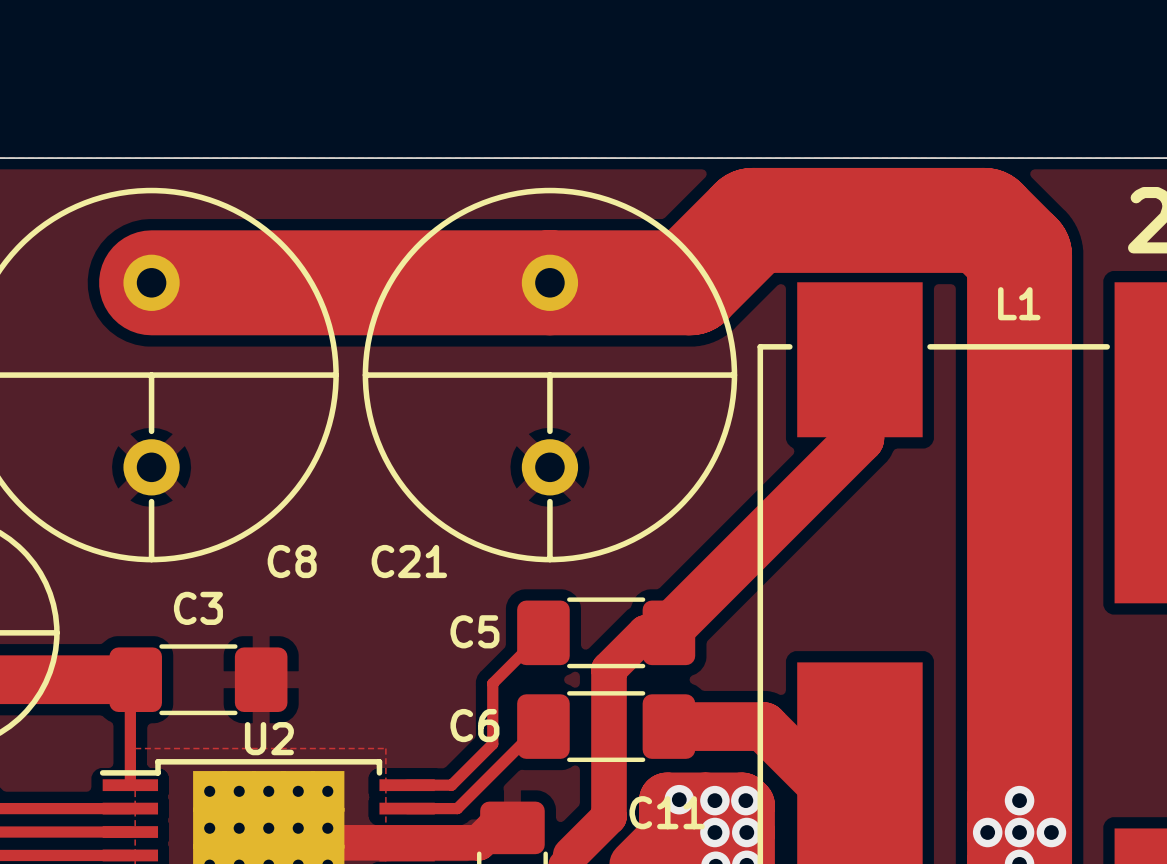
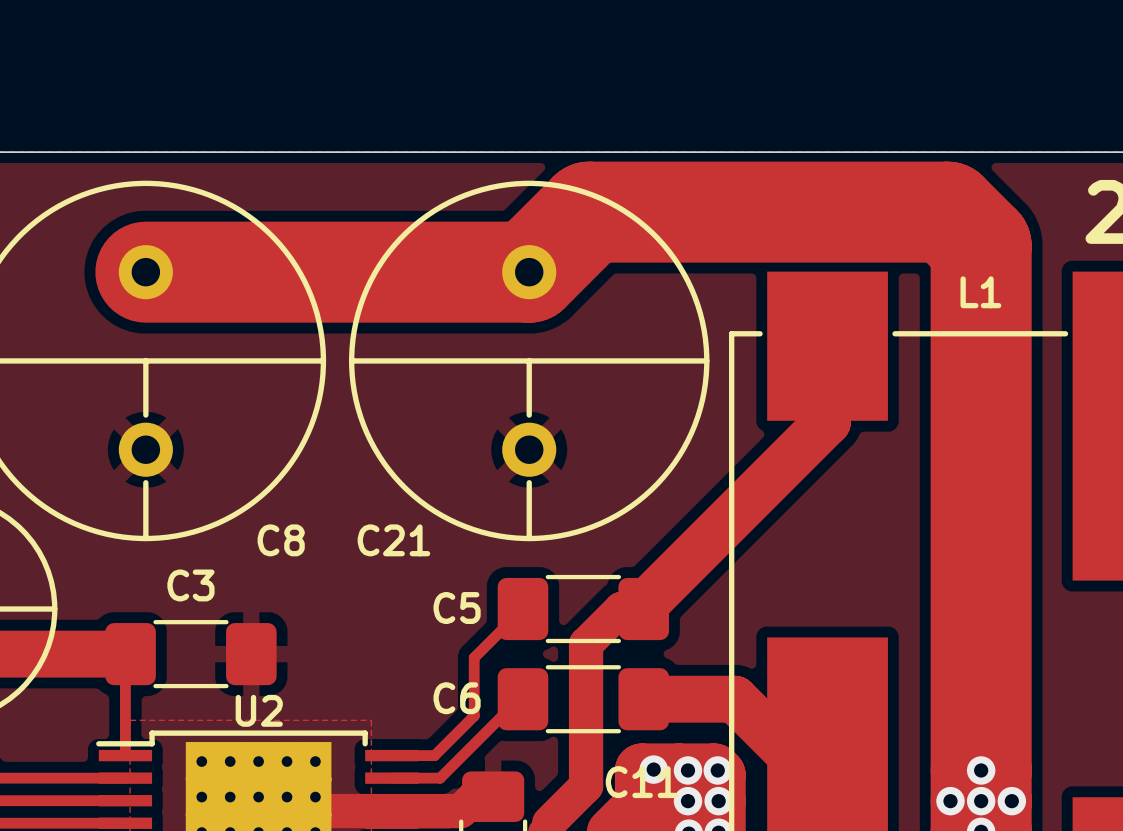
track: (752, 220) (690, 282) (549, 282) -> (724, 212) (589, 212) (529, 272)

